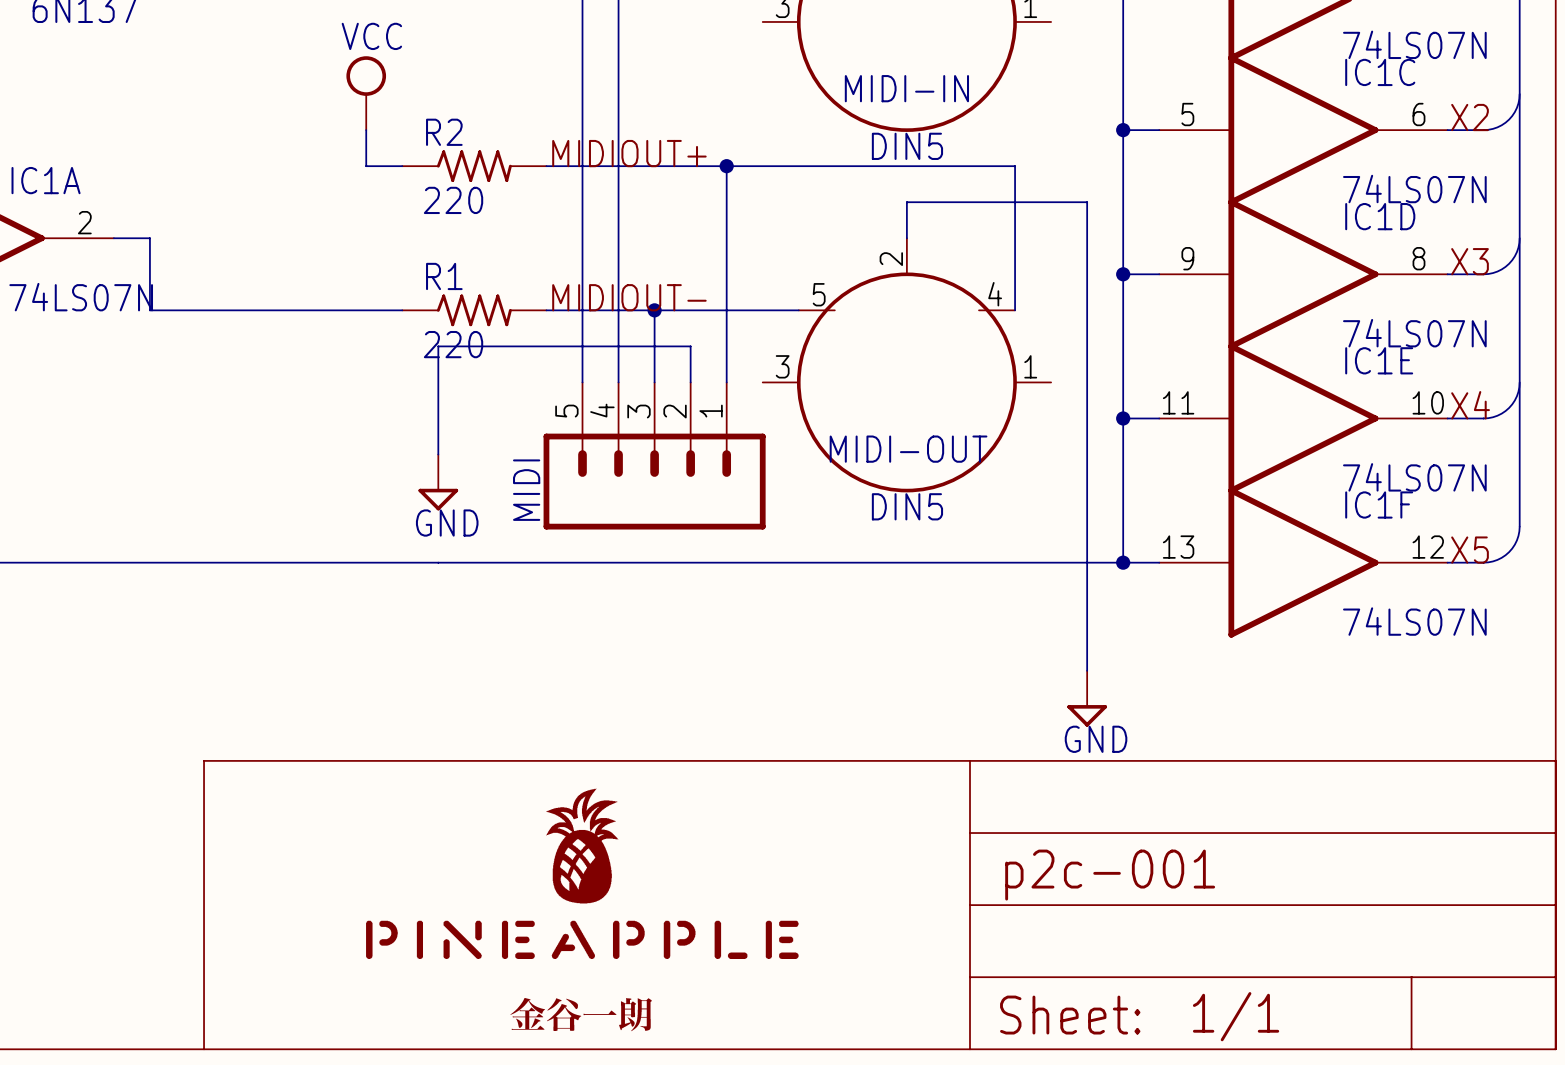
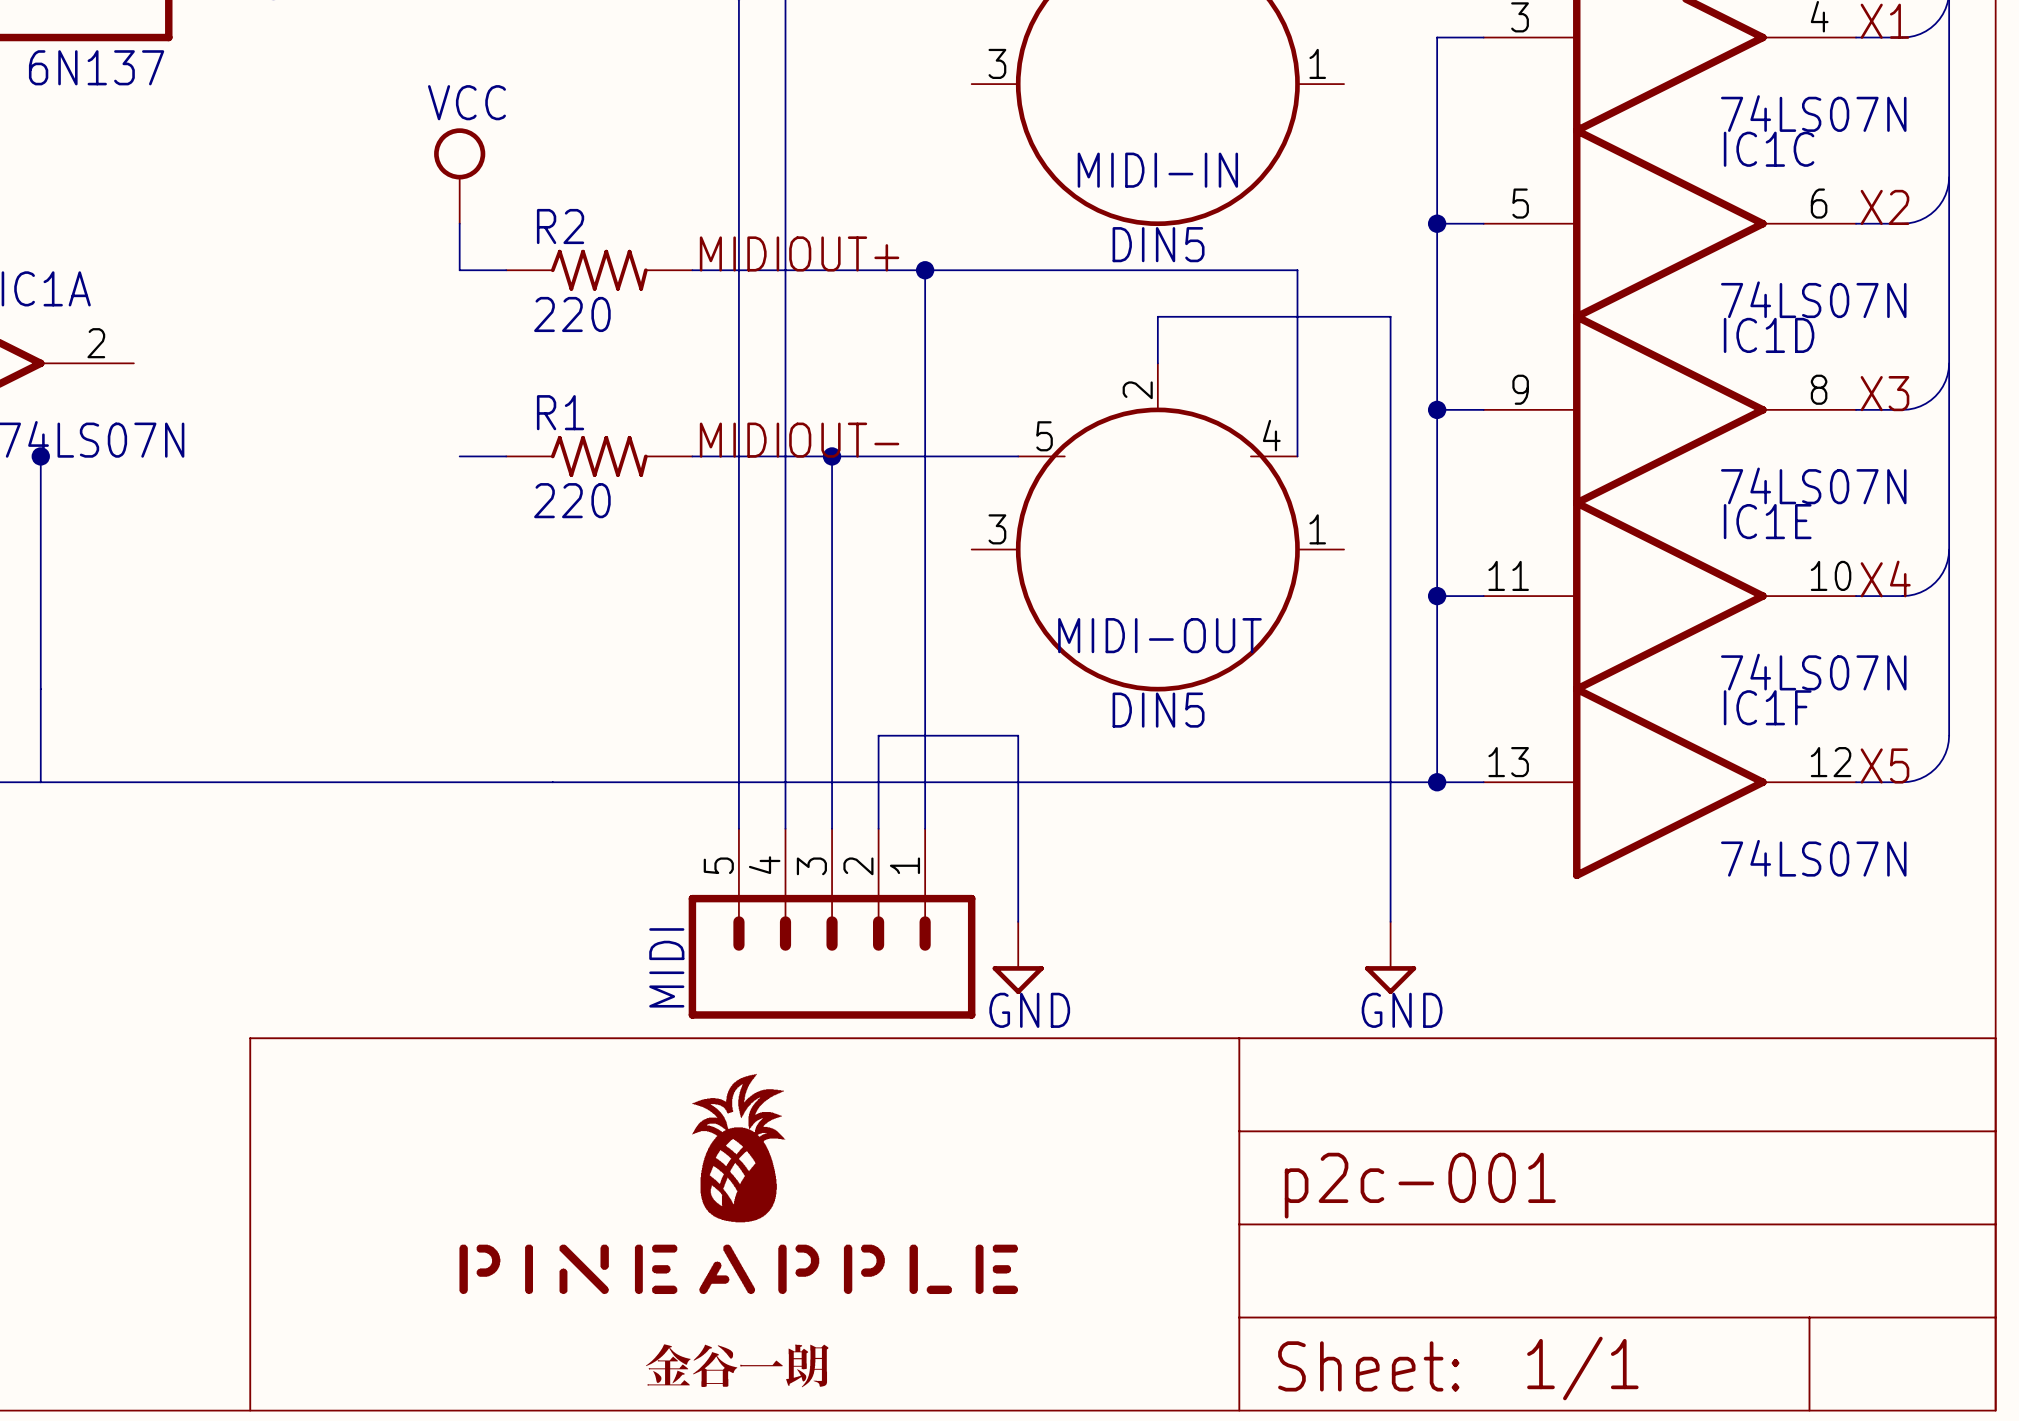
wire: (113, 238) (149, 238) (149, 310) (366, 310) -> none
wire: none -> (40, 456) (40, 782)
junction: none -> (40, 456)
wire: none -> (738, 549) (738, 828)
wire: none -> (785, 549) (785, 828)
wire: none -> (832, 549) (832, 828)
wire: (690, 382) (690, 346) (438, 346) (438, 454) -> none
wire: none -> (925, 549) (925, 828)
MIDI position: (654, 455) -> (832, 923)
power symbol: GND (438, 482) -> none
wire: none -> (878, 828) (878, 735) (1018, 735) (1018, 921)
power symbol: none -> GND (1018, 957)

